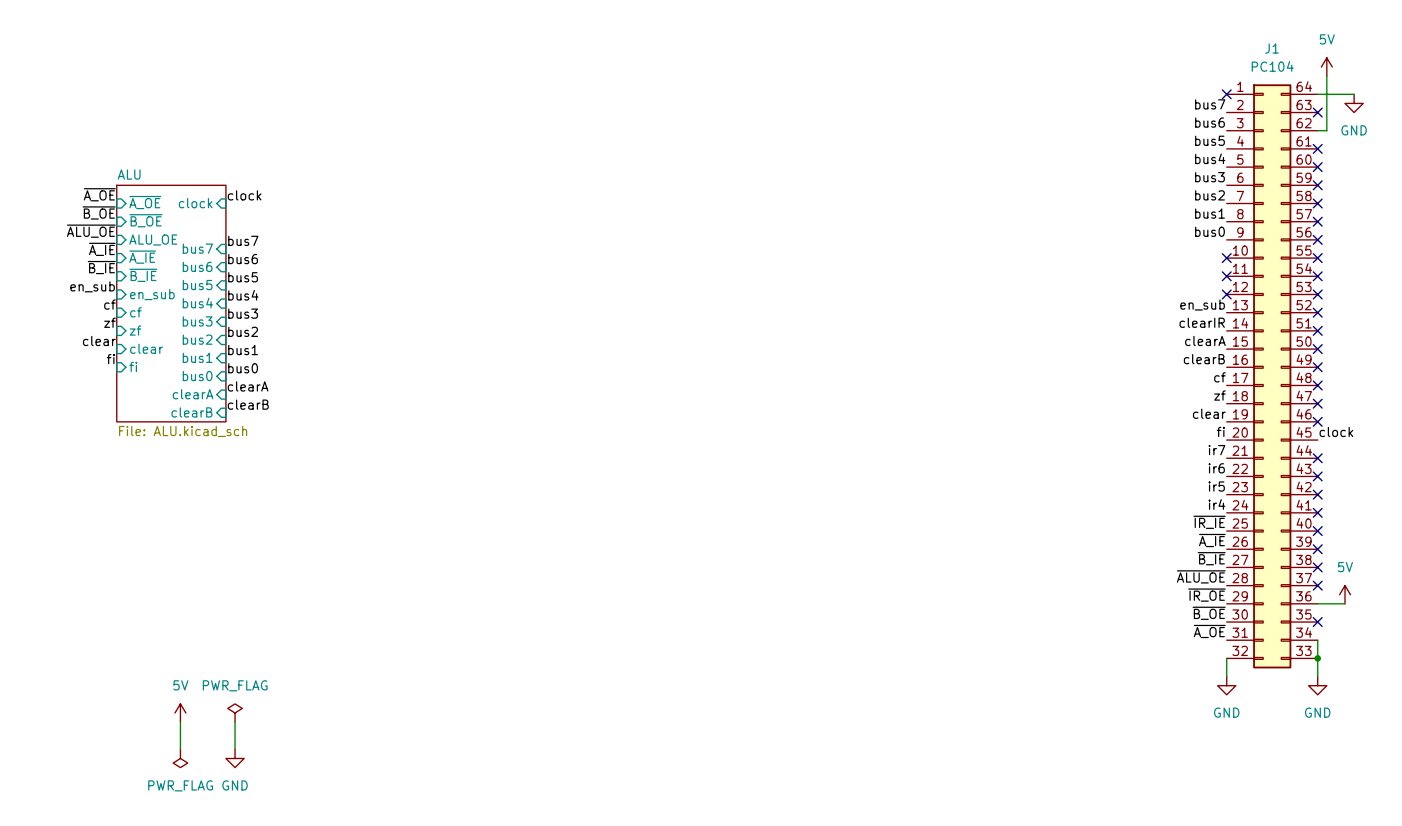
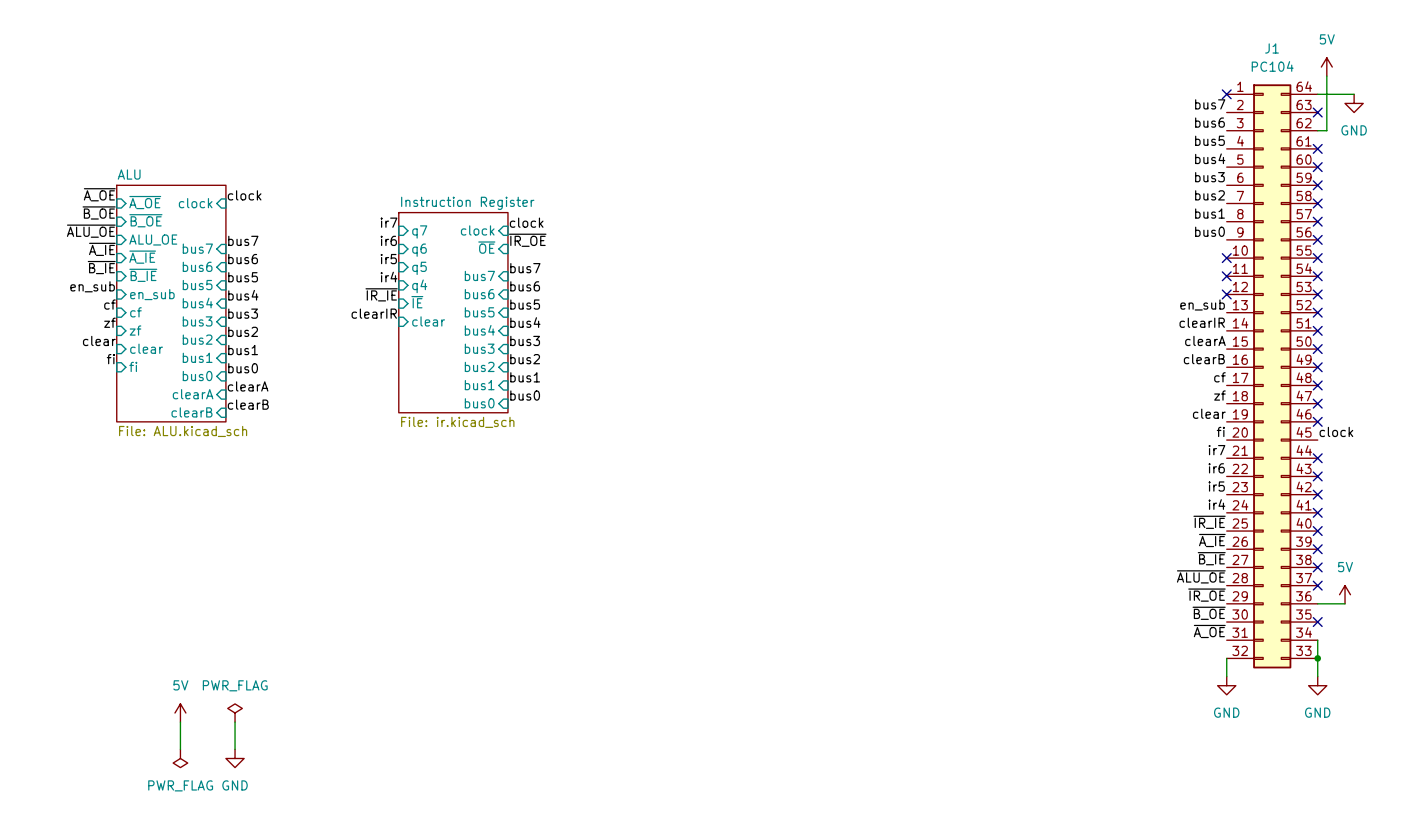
label: none -> ir7 (388, 222)
label: none -> clock (526, 222)
sheet pin: none -> clock (477, 230)
sheet pin: none -> q7 (419, 231)
label: none -> ir6 (388, 240)
label: none -> ~{IR_OE} (527, 240)
sheet pin: none -> ~{OE} (486, 247)
sheet pin: none -> q6 (419, 250)
label: none -> ir5 (388, 259)
sheet pin: none -> q5 (419, 268)
label: none -> bus7 (525, 268)
sheet pin: none -> bus7 (479, 275)
label: none -> ir4 (388, 277)
sheet pin: none -> q4 (419, 286)
label: none -> bus6 (525, 286)
label: none -> ~{IR_IE} (381, 294)
sheet pin: none -> bus6 (479, 294)
sheet pin: none -> ~{IE} (417, 302)
label: none -> bus5 (525, 304)
sheet Instruction Register: none -> File: ir.kicad_sch (453, 312)
sheet pin: none -> bus5 (479, 312)
label: none -> clearIR (374, 313)
sheet pin: none -> clear (428, 321)
label: none -> bus4 (525, 322)
sheet pin: none -> bus4 (479, 330)
label: none -> bus3 (525, 340)
sheet pin: none -> bus3 (479, 348)
label: none -> bus2 (525, 359)
sheet pin: none -> bus2 (479, 366)
label: none -> bus1 (525, 377)
sheet pin: none -> bus1 (479, 385)
label: none -> bus0 (525, 395)
sheet pin: none -> bus0 (479, 403)

